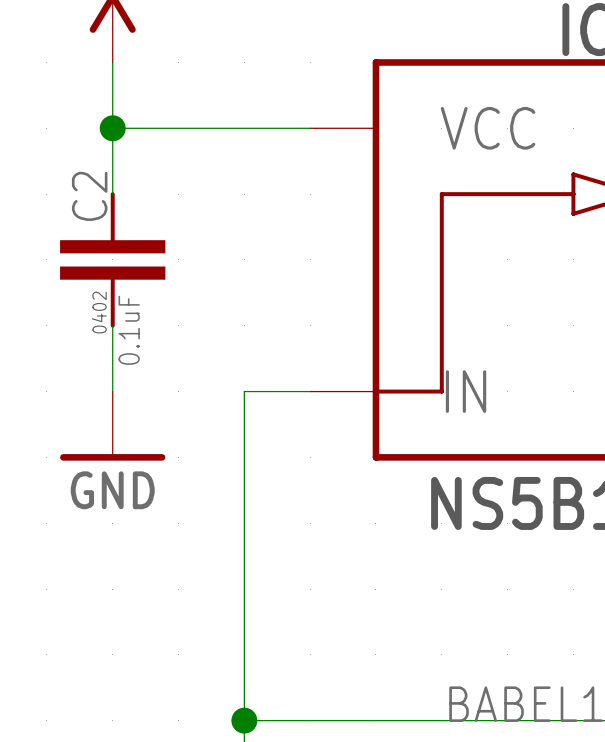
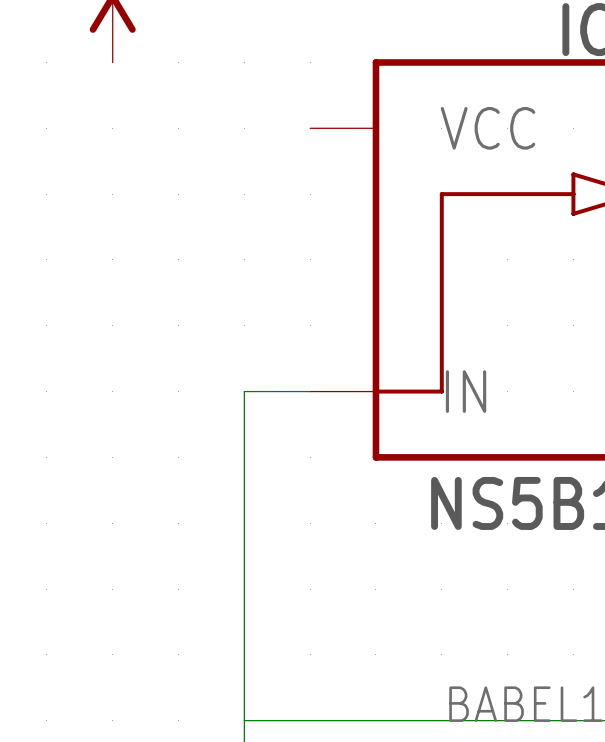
wire: (112, 62) (112, 194) -> none
wire: (112, 128) (310, 128) -> none
junction: (112, 128) -> none
C2: 0.1uF (112, 259) -> none
wire: (112, 325) (112, 391) -> none
power symbol: GND (112, 426) -> none
junction: (244, 720) -> none

